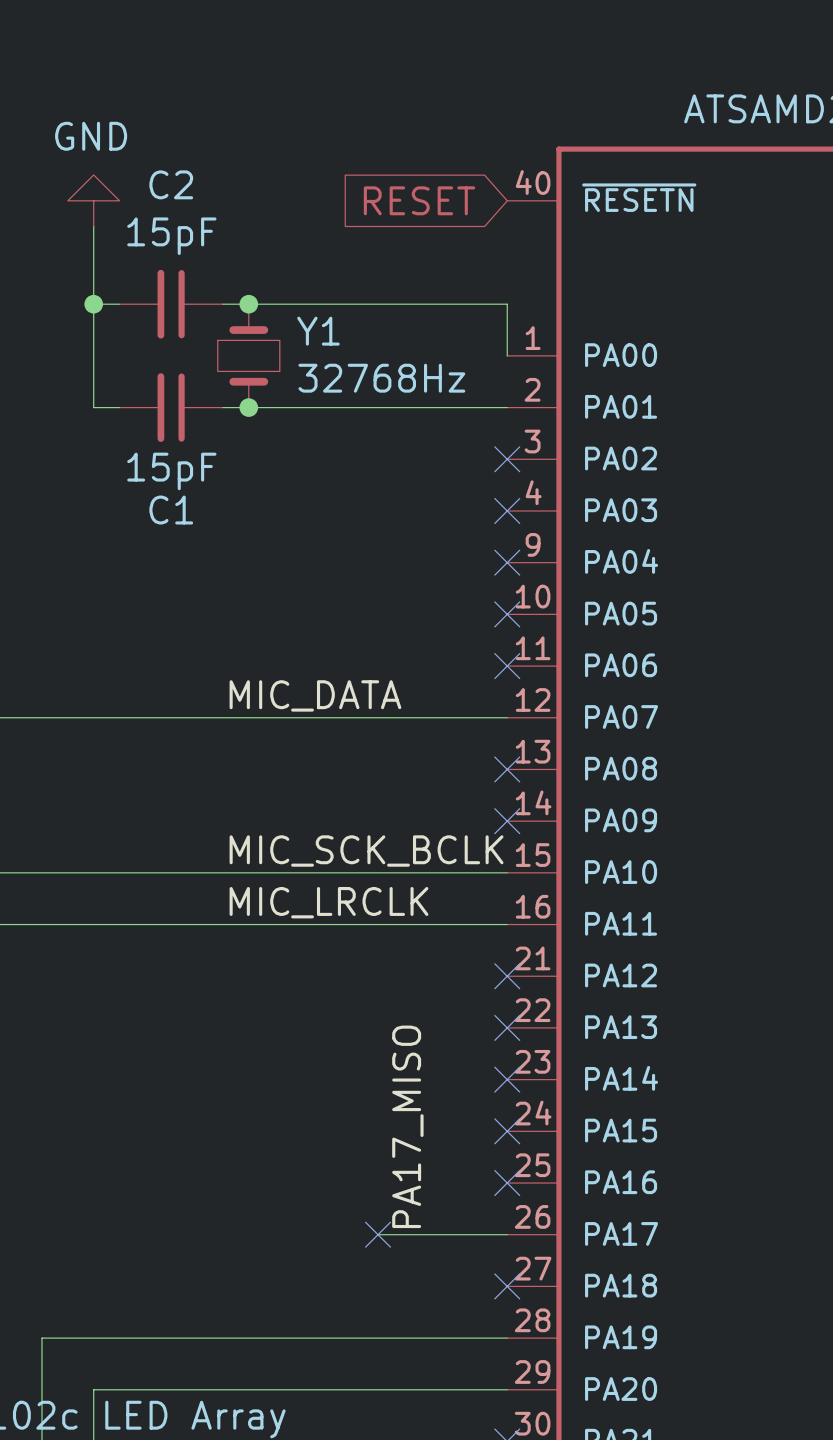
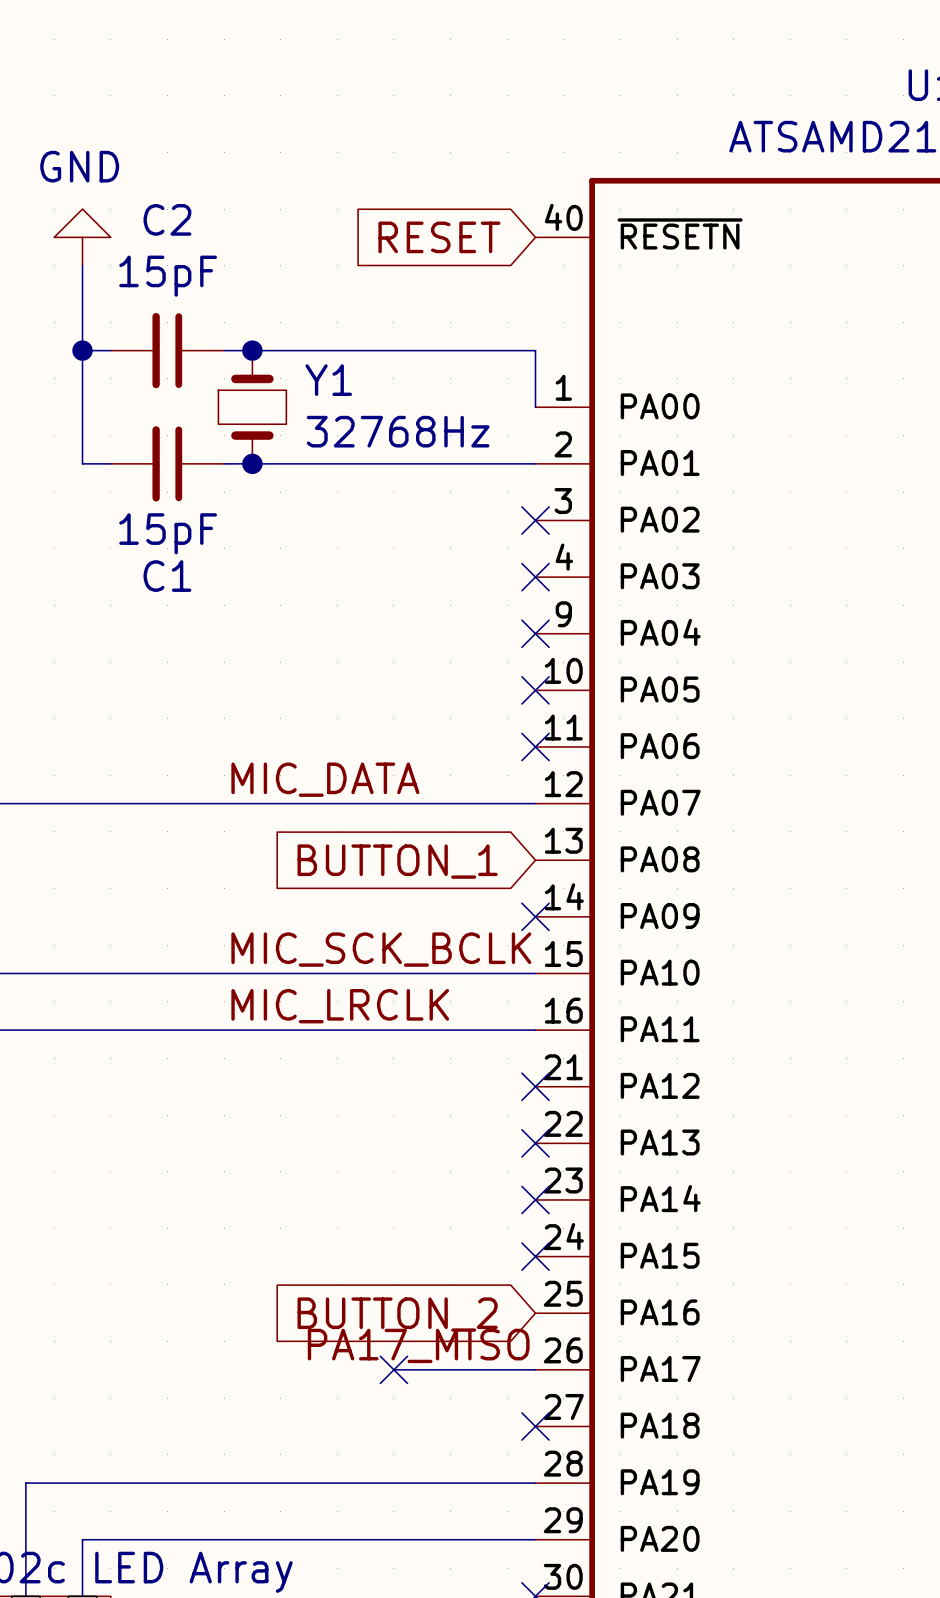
no-connect mark: (507, 769) -> none
global label: none -> BUTTON_1 (397, 861)
label rotation: 0° (407, 1126) -> 90° clockwise (418, 1345)
no-connect mark: (507, 1183) -> none
global label: none -> BUTTON_2 (397, 1314)

